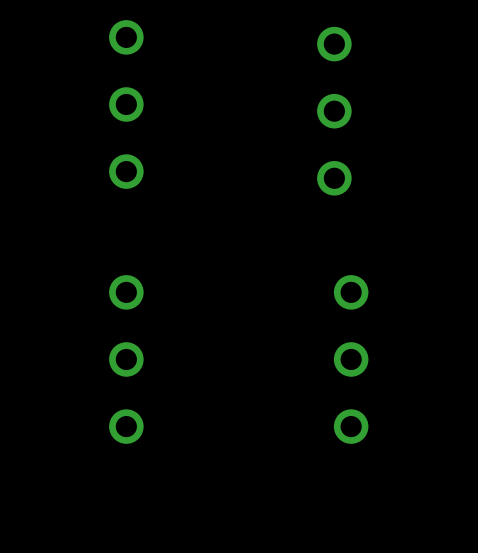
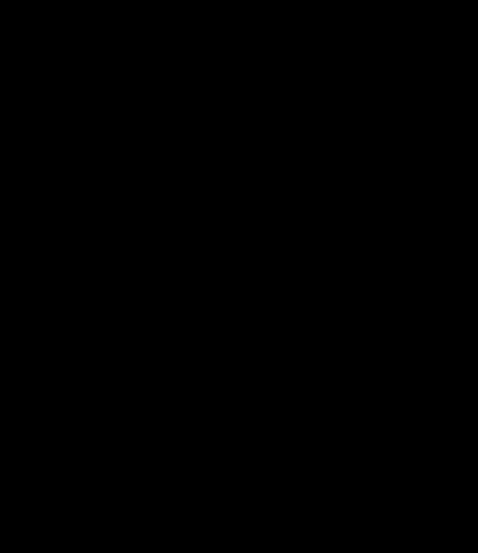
part: (126, 104) -> none
part: (334, 111) -> none
part: (126, 359) -> none
part: (351, 359) -> none

